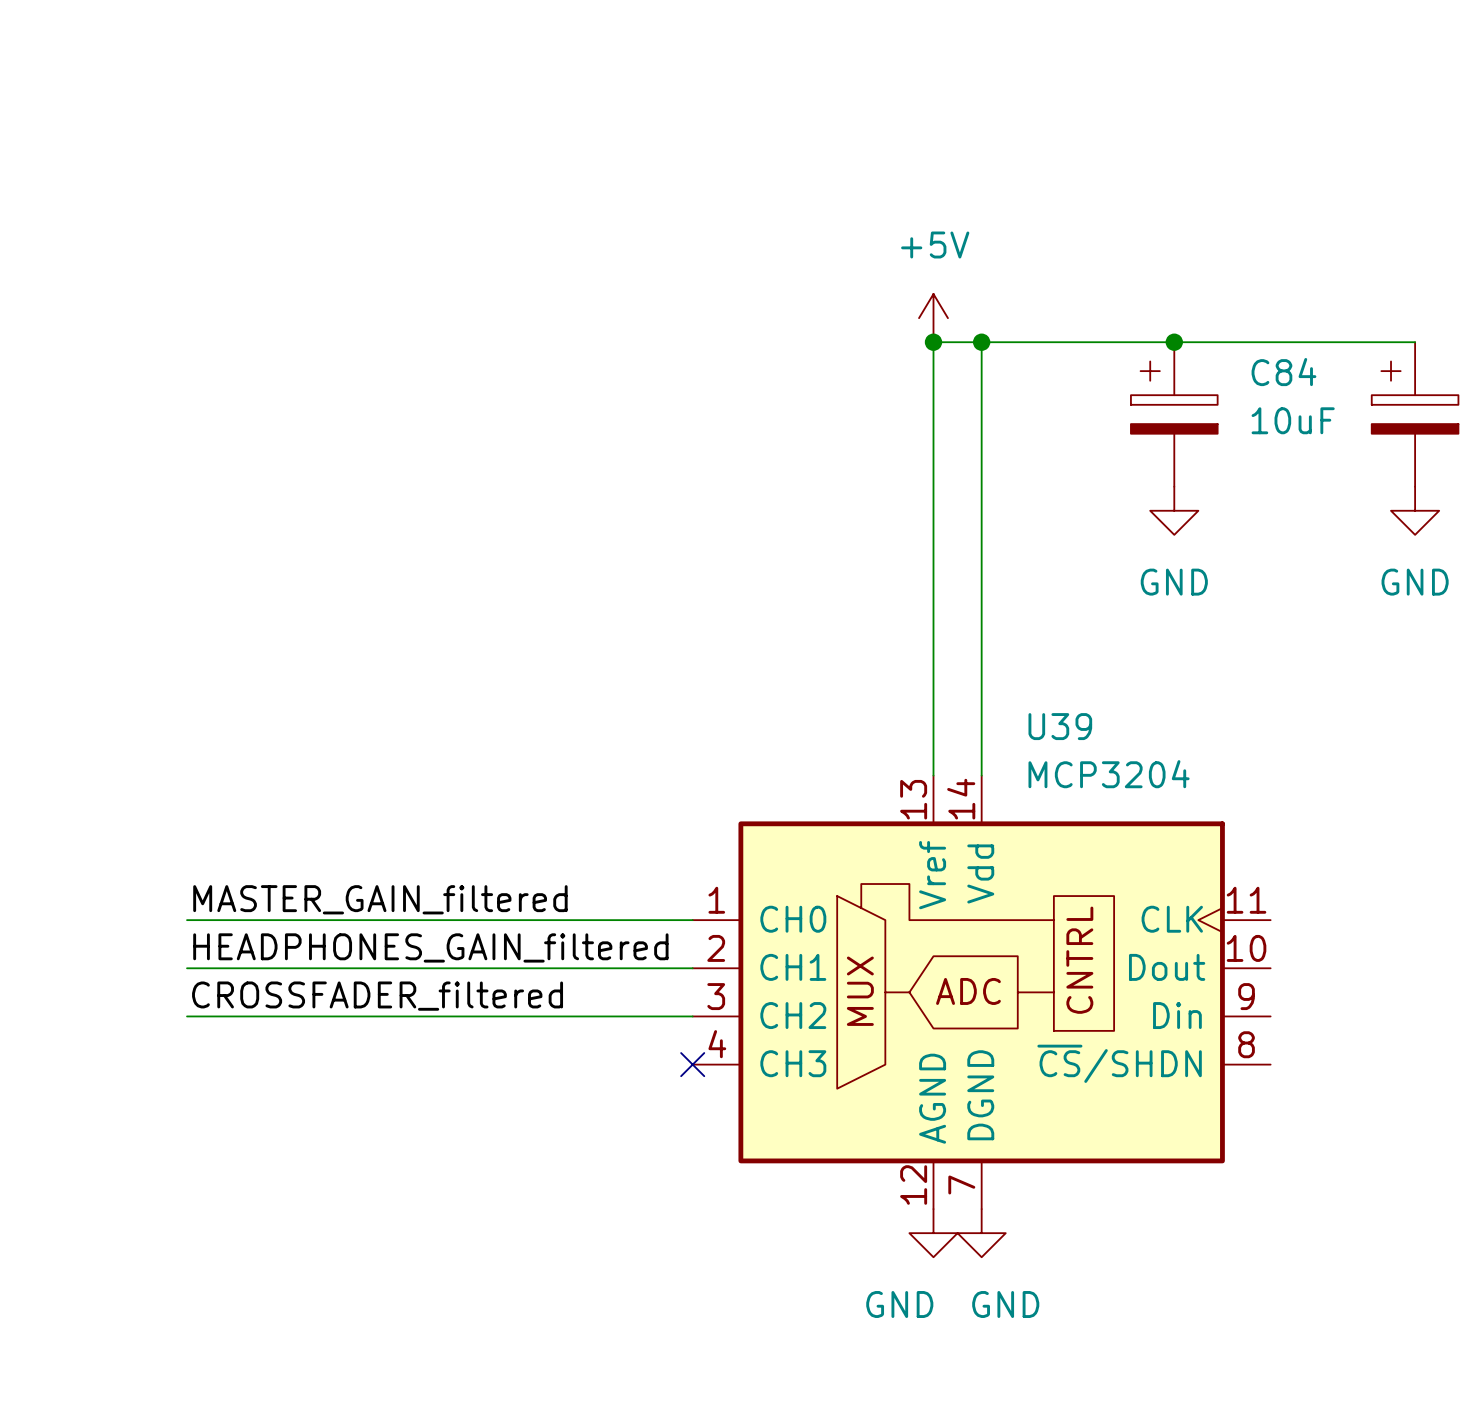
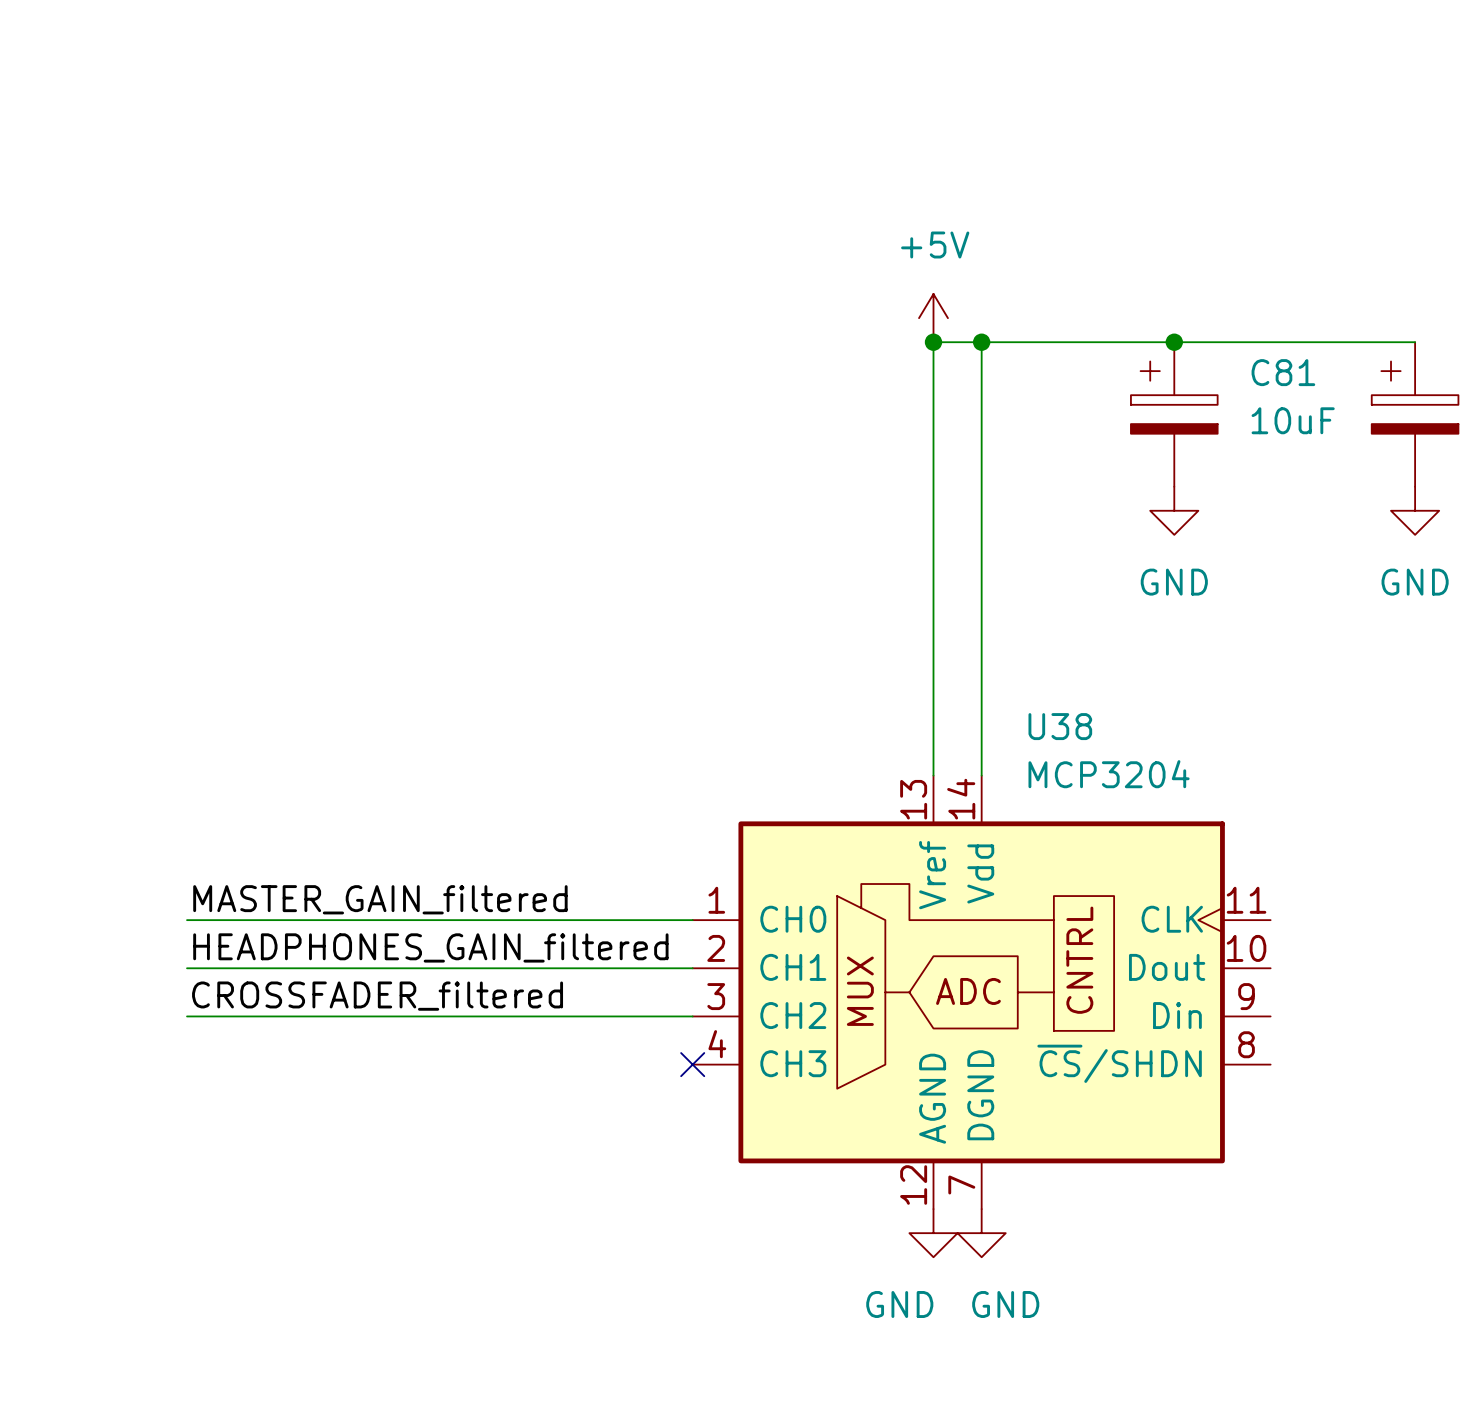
C84 name: C84 (1283, 372) -> C81 (1283, 372)
U39 name: U39 (1060, 726) -> U38 (1060, 726)

